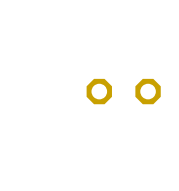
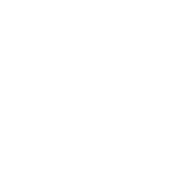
part: (123, 91) -> none

